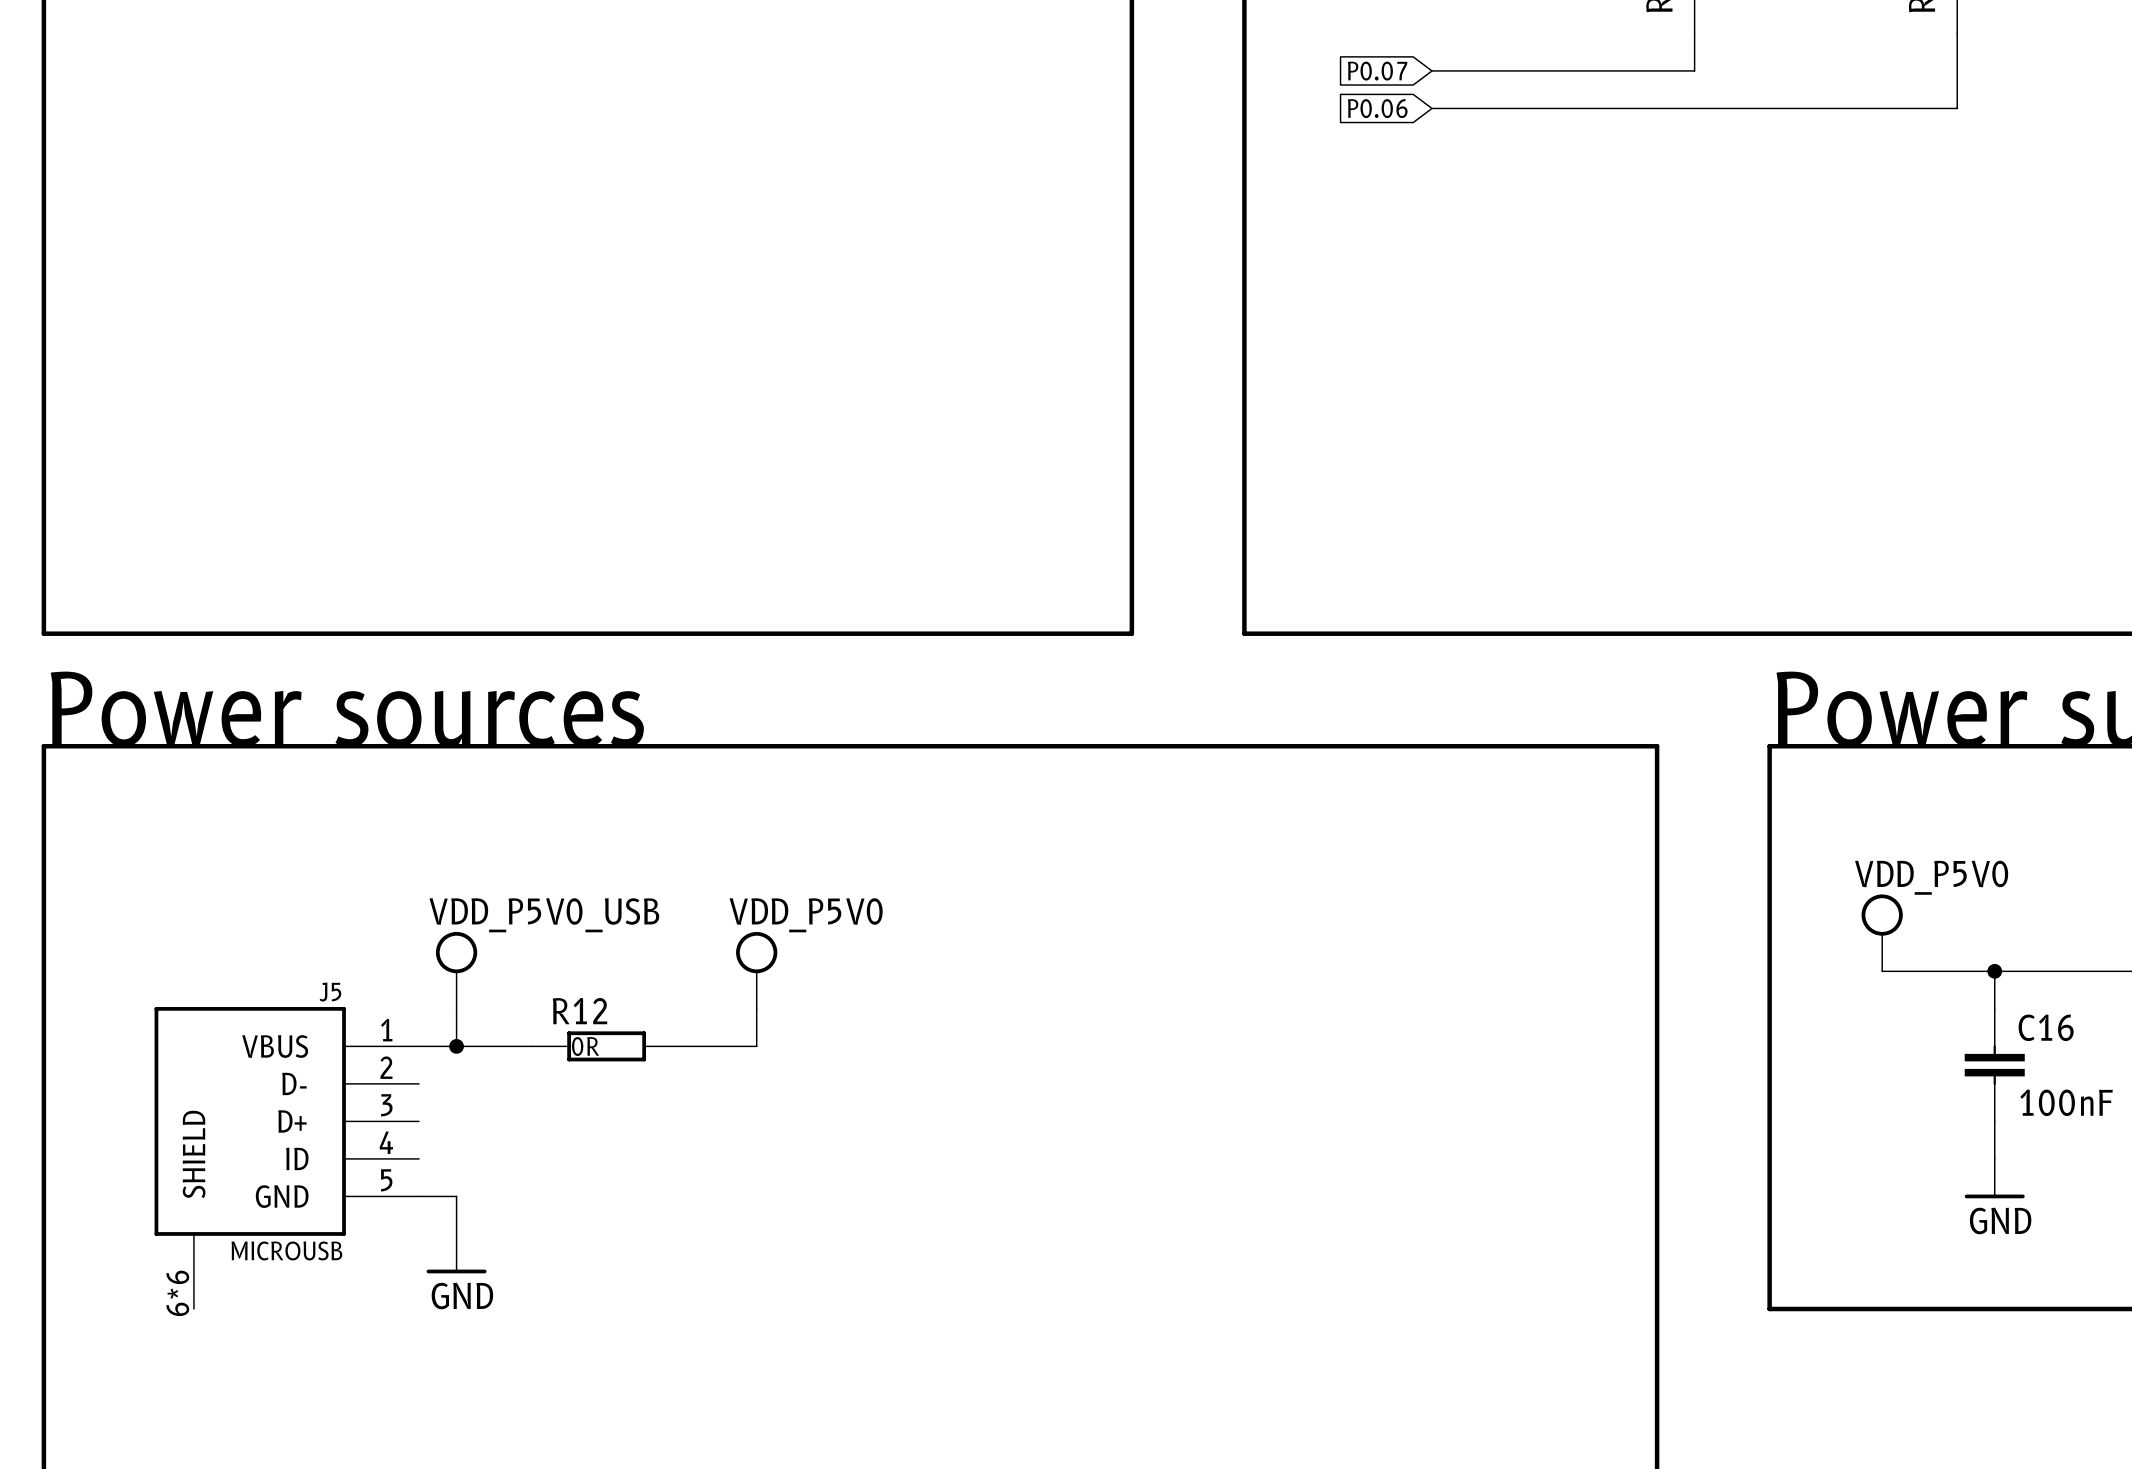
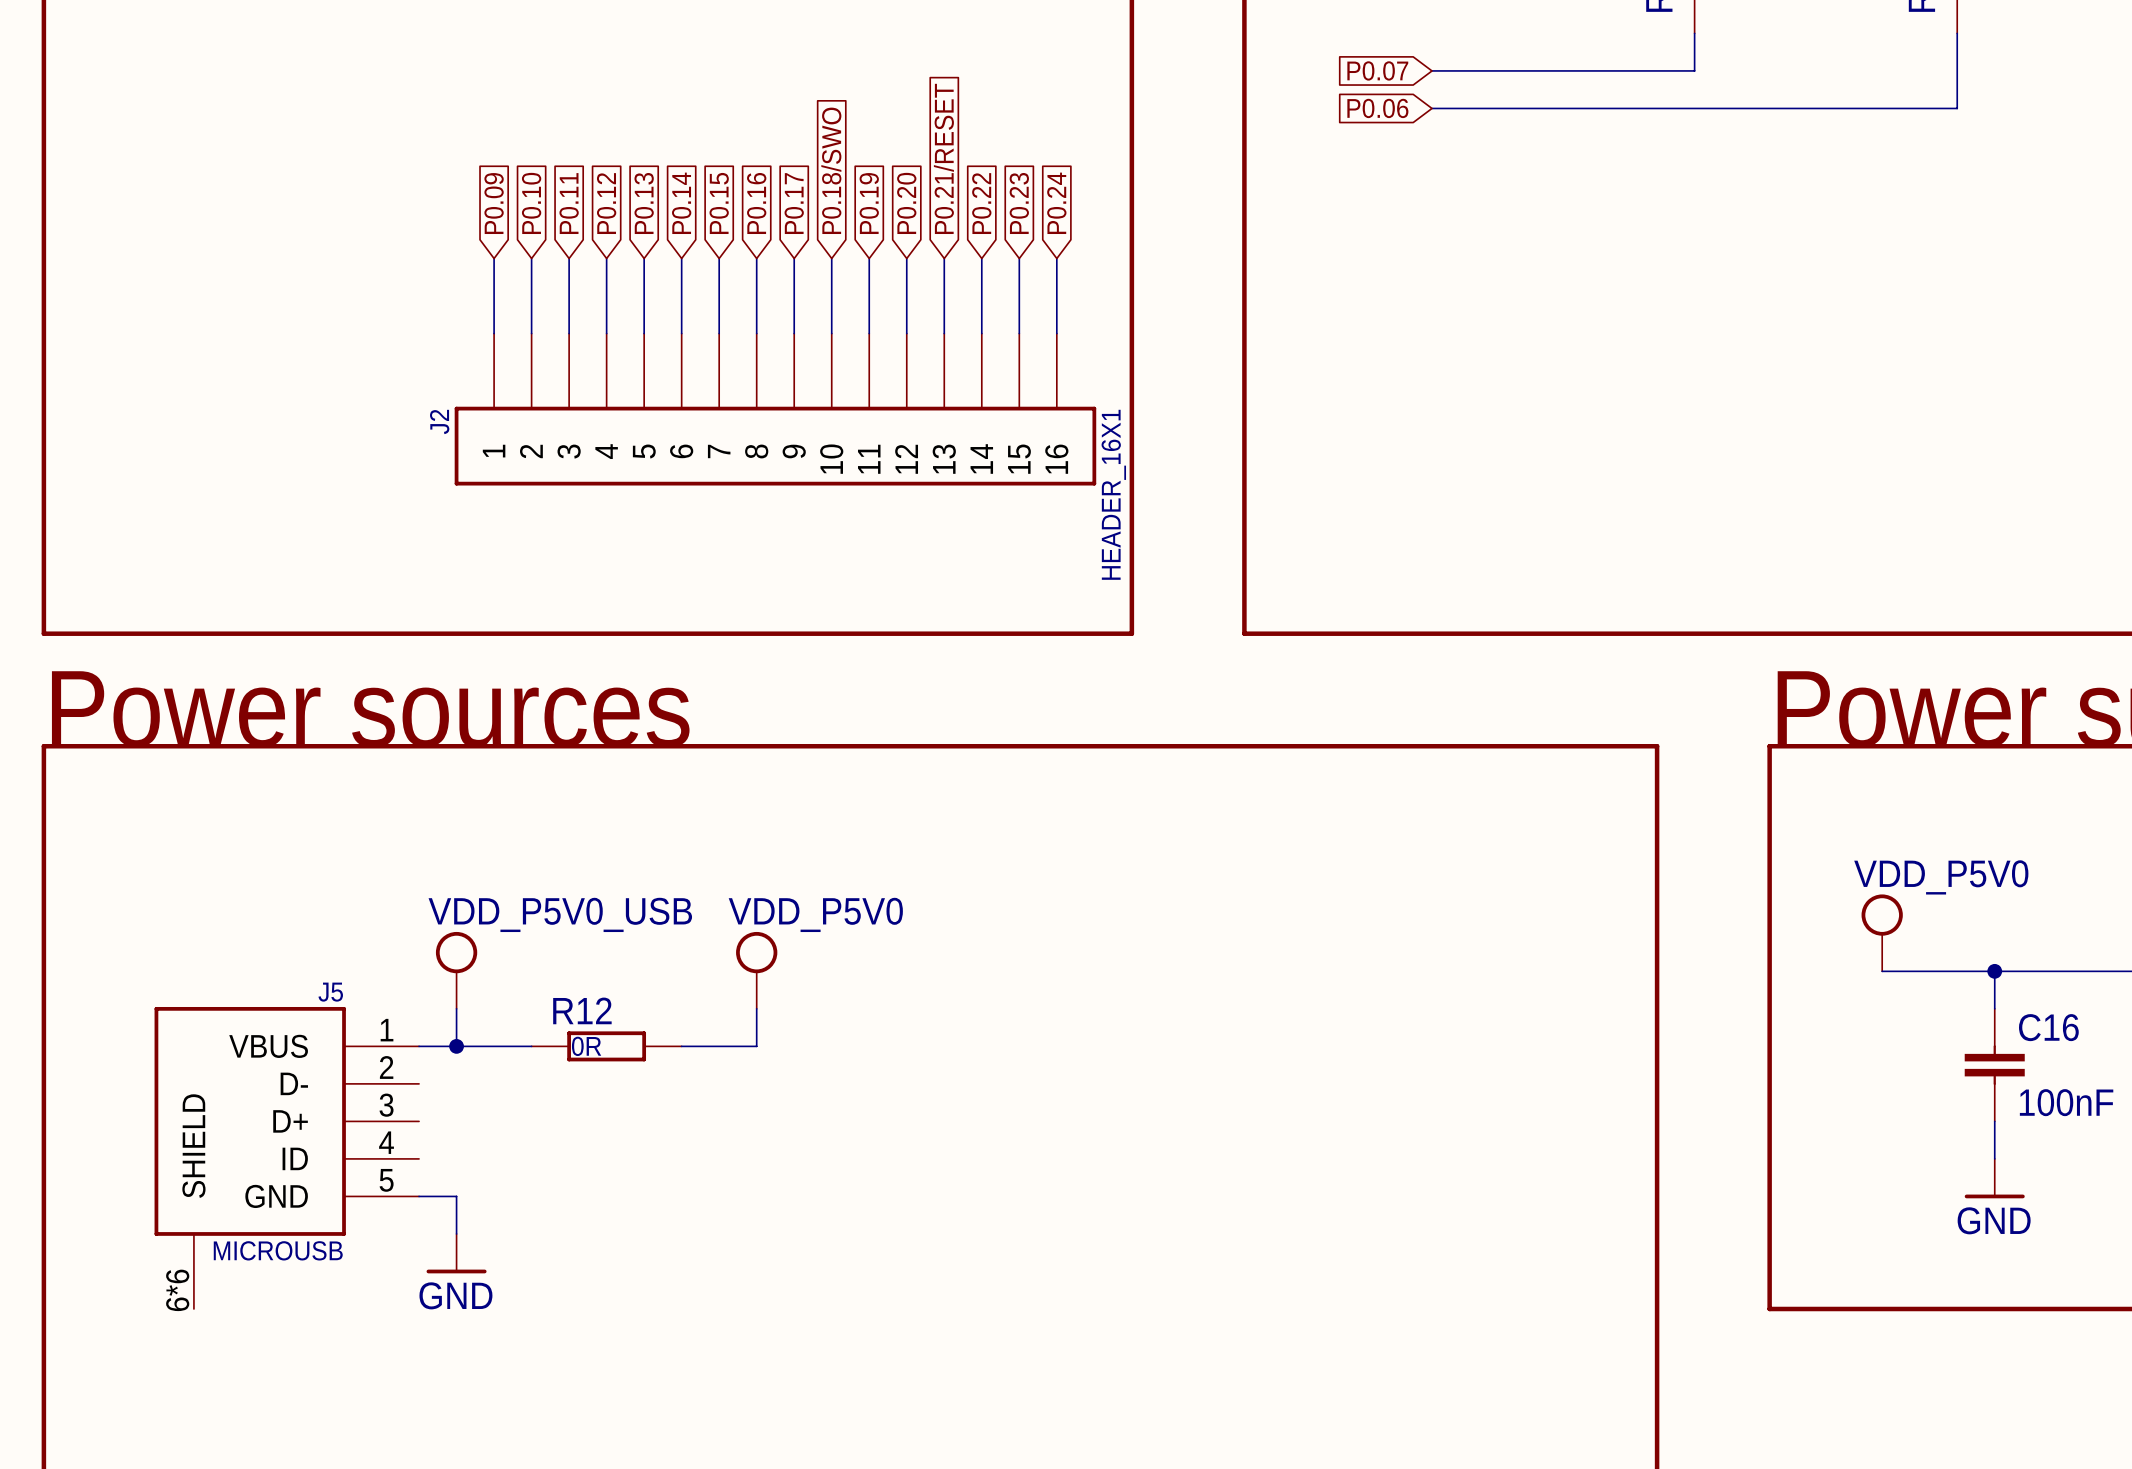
global label: none -> P0.21/RESET (943, 158)
global label: none -> P0.18/SWO (831, 170)
global label: none -> P0.09 (494, 203)
global label: none -> P0.10 (531, 203)
global label: none -> P0.11 (569, 203)
global label: none -> P0.12 (606, 203)
global label: none -> P0.13 (644, 203)
global label: none -> P0.14 (681, 203)
global label: none -> P0.15 (719, 203)
global label: none -> P0.16 (756, 203)
global label: none -> P0.17 (794, 203)
global label: none -> P0.19 (869, 203)
global label: none -> P0.20 (906, 203)
global label: none -> P0.22 (981, 203)
global label: none -> P0.23 (1019, 203)
global label: none -> P0.24 (1056, 203)
wire: none -> (494, 258) (494, 333)
wire: none -> (531, 258) (531, 333)
wire: none -> (569, 258) (569, 333)
wire: none -> (606, 258) (606, 333)
wire: none -> (644, 258) (644, 333)
wire: none -> (681, 258) (681, 333)
wire: none -> (719, 258) (719, 333)
wire: none -> (756, 258) (756, 333)
wire: none -> (794, 258) (794, 333)
wire: none -> (831, 258) (831, 333)
wire: none -> (869, 258) (869, 333)
wire: none -> (906, 258) (906, 333)
wire: none -> (944, 258) (944, 333)
wire: none -> (981, 258) (981, 333)
wire: none -> (1019, 258) (1019, 333)
wire: none -> (1056, 258) (1056, 333)
J2: none -> HEADER_16X1 (775, 409)

